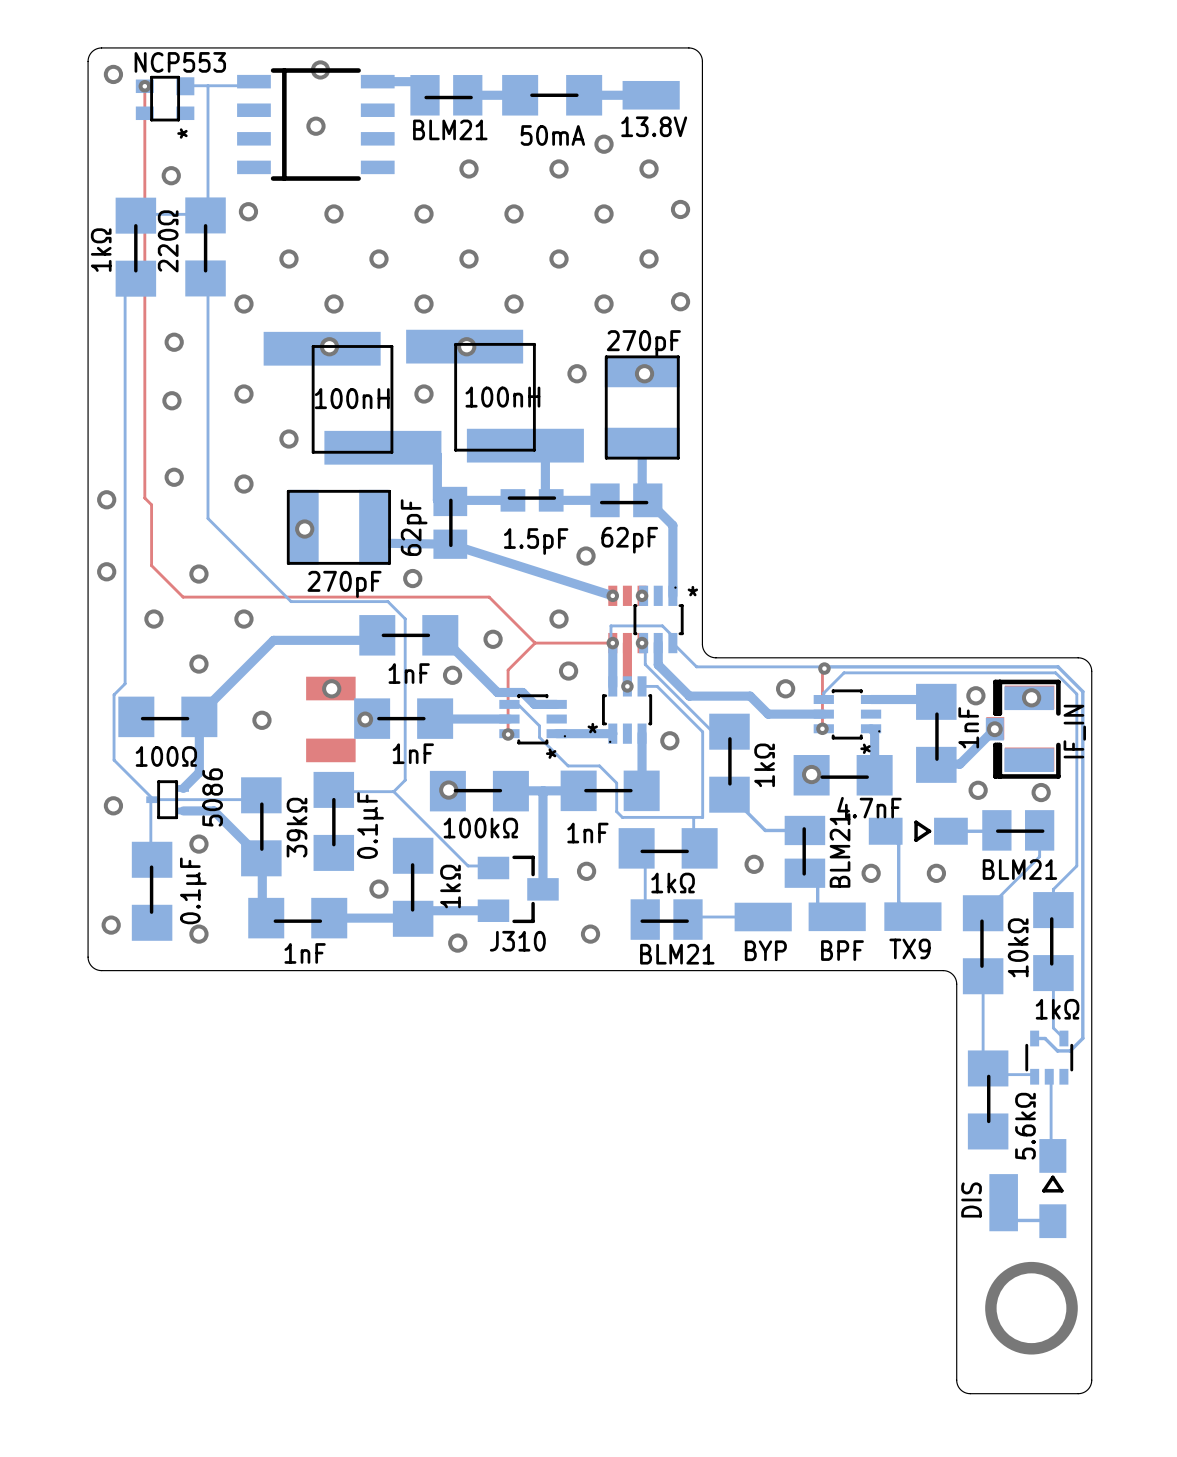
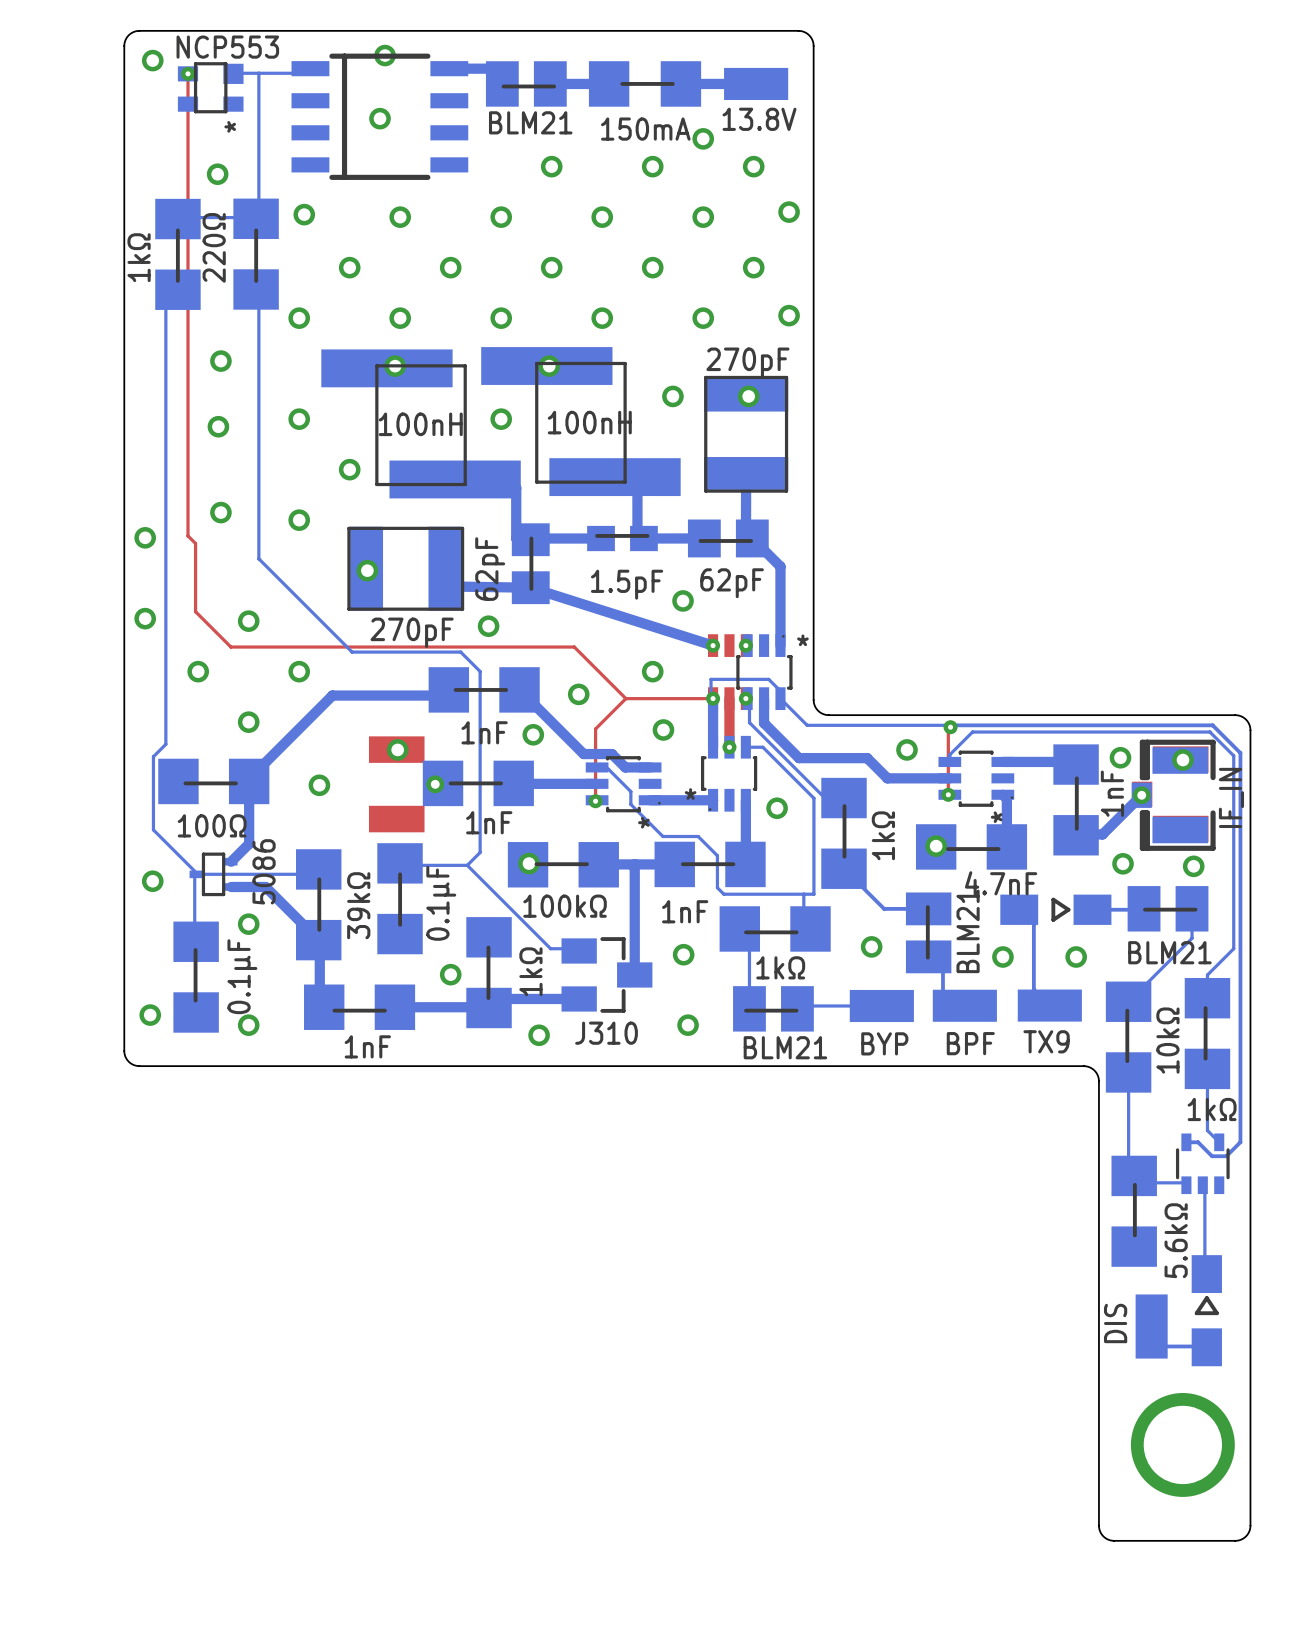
part value: 50mA (552, 135) -> 150mA (645, 129)

